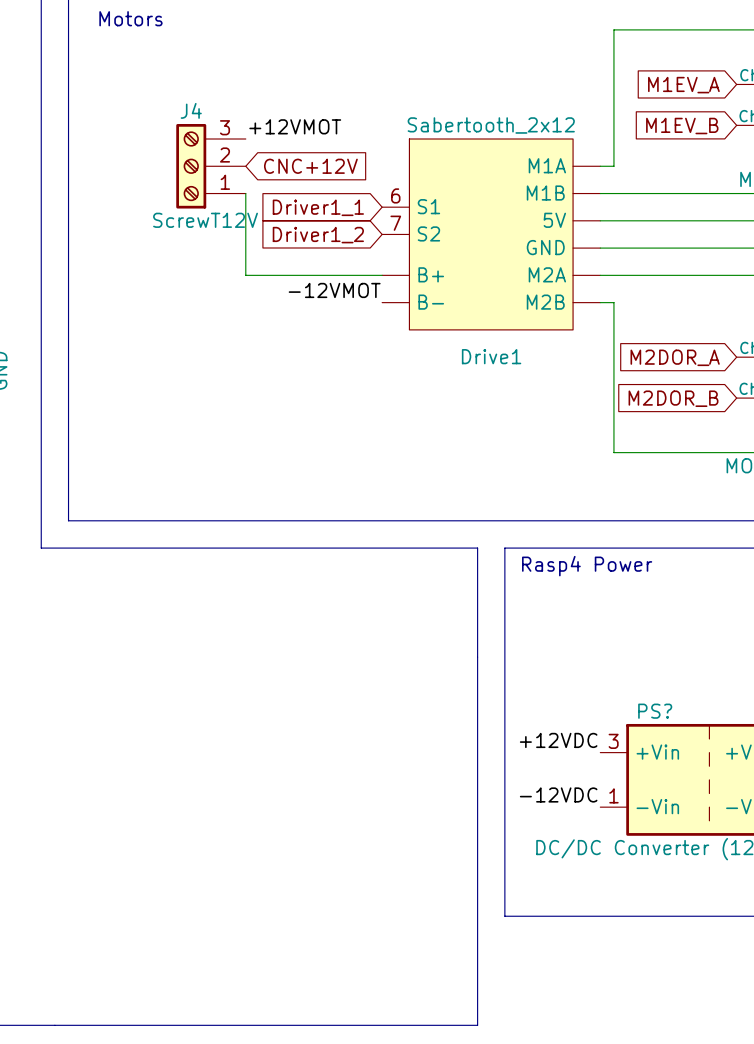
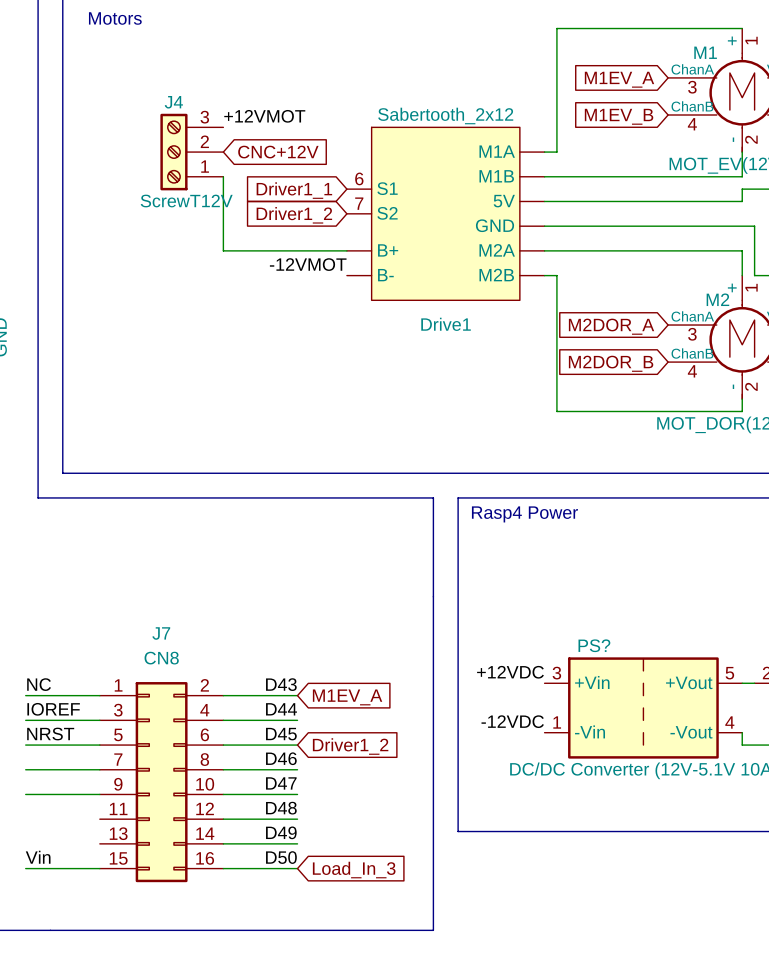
label: none -> D43 (281, 684)
label: none -> NC (39, 684)
wire: none -> (25, 695) (99, 695)
wire: none -> (223, 695) (297, 695)
global label: none -> M1EV_A (347, 697)
label: none -> IOREF (53, 709)
label: none -> D44 (281, 709)
wire: none -> (25, 720) (99, 720)
wire: none -> (223, 720) (297, 720)
label: none -> NRST (50, 734)
label: none -> D45 (281, 734)
wire: none -> (25, 745) (99, 745)
wire: none -> (223, 745) (297, 745)
global label: none -> Driver1_2 (350, 746)
label: none -> D46 (281, 758)
wire: none -> (25, 769) (99, 769)
wire: none -> (223, 769) (297, 769)
J7: none -> CN8 (161, 782)
label: none -> D47 (281, 783)
wire: none -> (25, 794) (99, 794)
wire: none -> (223, 794) (297, 794)
label: none -> D48 (281, 808)
wire: none -> (223, 819) (297, 819)
label: none -> D49 (281, 832)
wire: none -> (223, 843) (297, 843)
label: none -> Vin (38, 857)
label: none -> D50 (281, 857)
wire: none -> (25, 868) (99, 868)
wire: none -> (223, 868) (297, 868)
global label: none -> Load_In_3 (354, 870)

